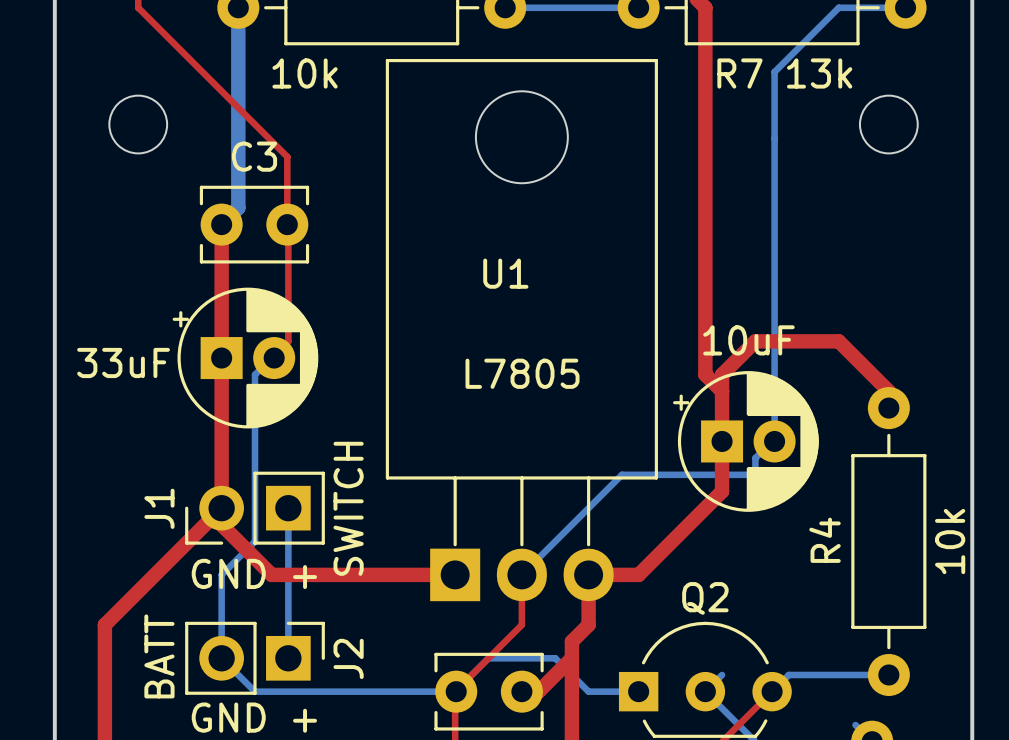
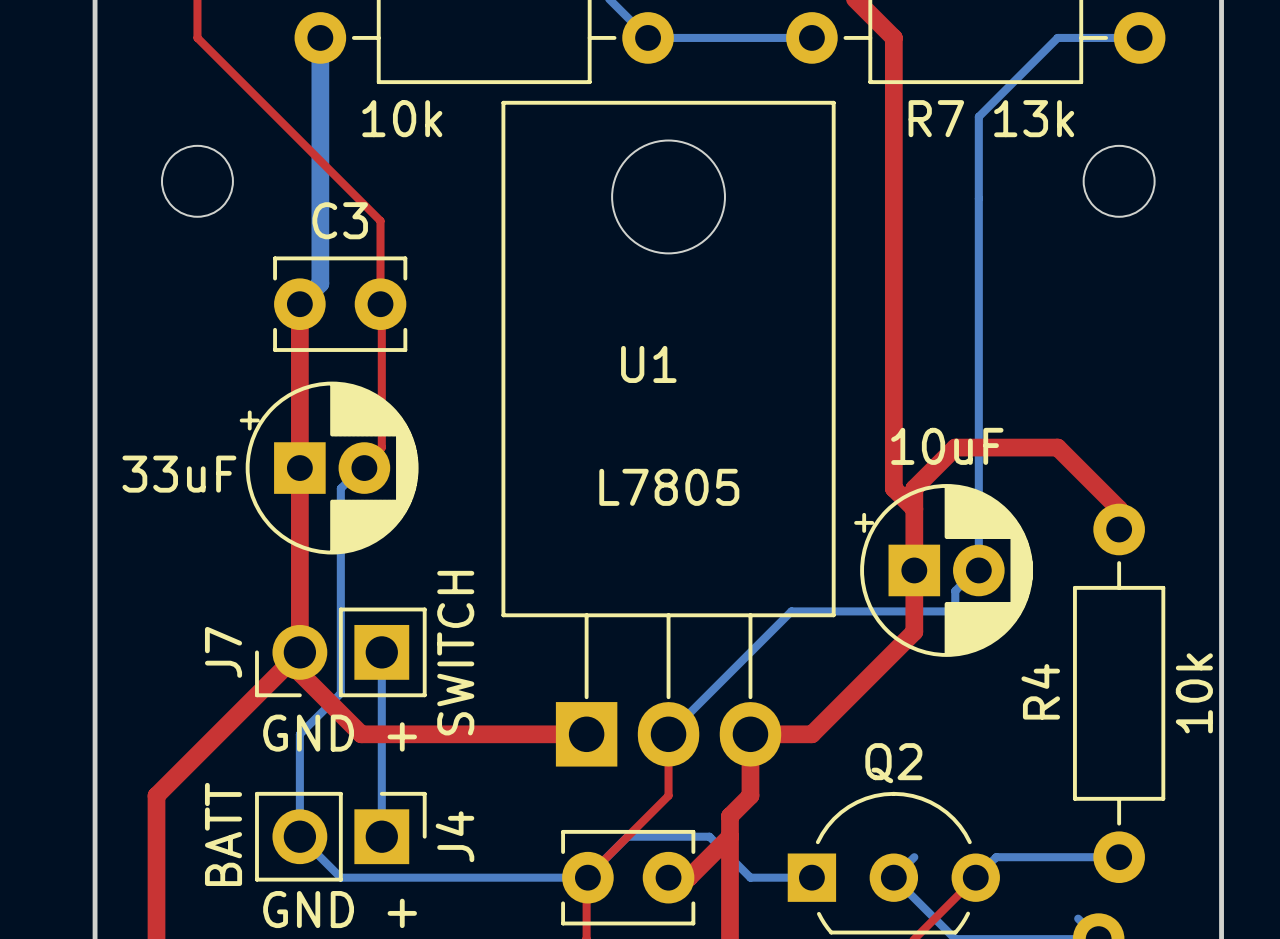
J1 name: J1 (159, 508) -> J7 (223, 652)
J2 name: J2 (348, 658) -> J4 (454, 836)

